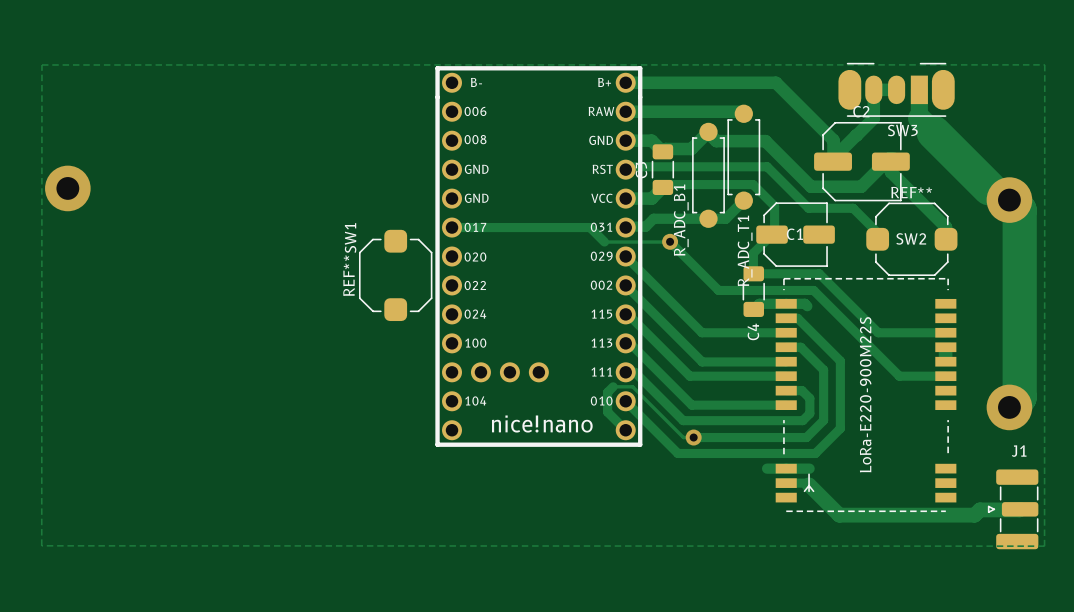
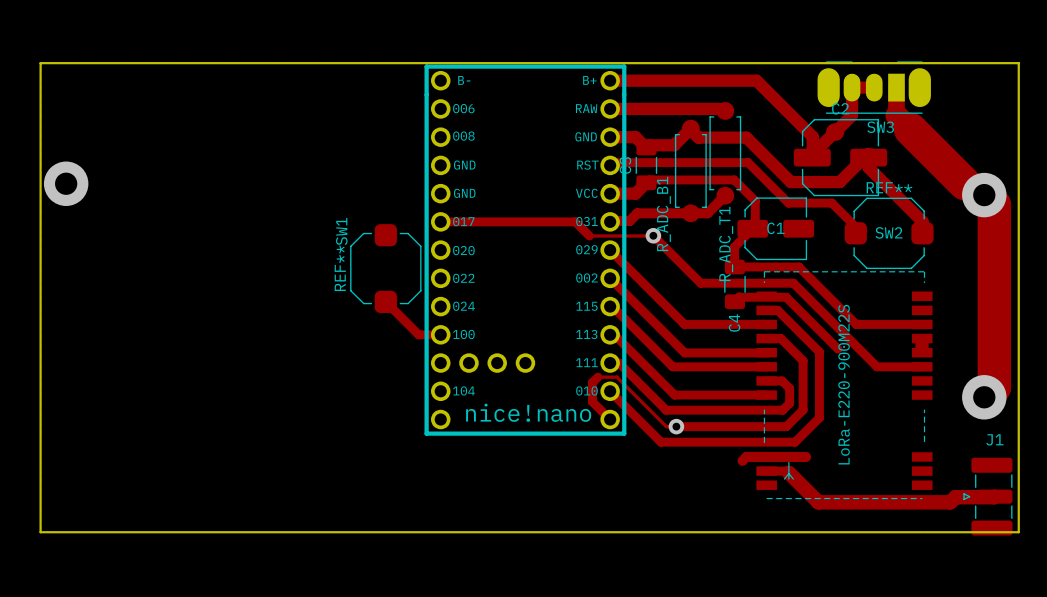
board edge: none -> (40, 63) (1018, 63) (1018, 532) (40, 532) (40, 63)
track: (758, 304) (804, 303) (807, 306) -> (739, 297) (786, 297) (838, 349)
track: none -> (385, 301) (418, 334) (440, 334)
track: none -> (747, 456) (742, 460)
track: none -> (789, 456) (806, 456)

